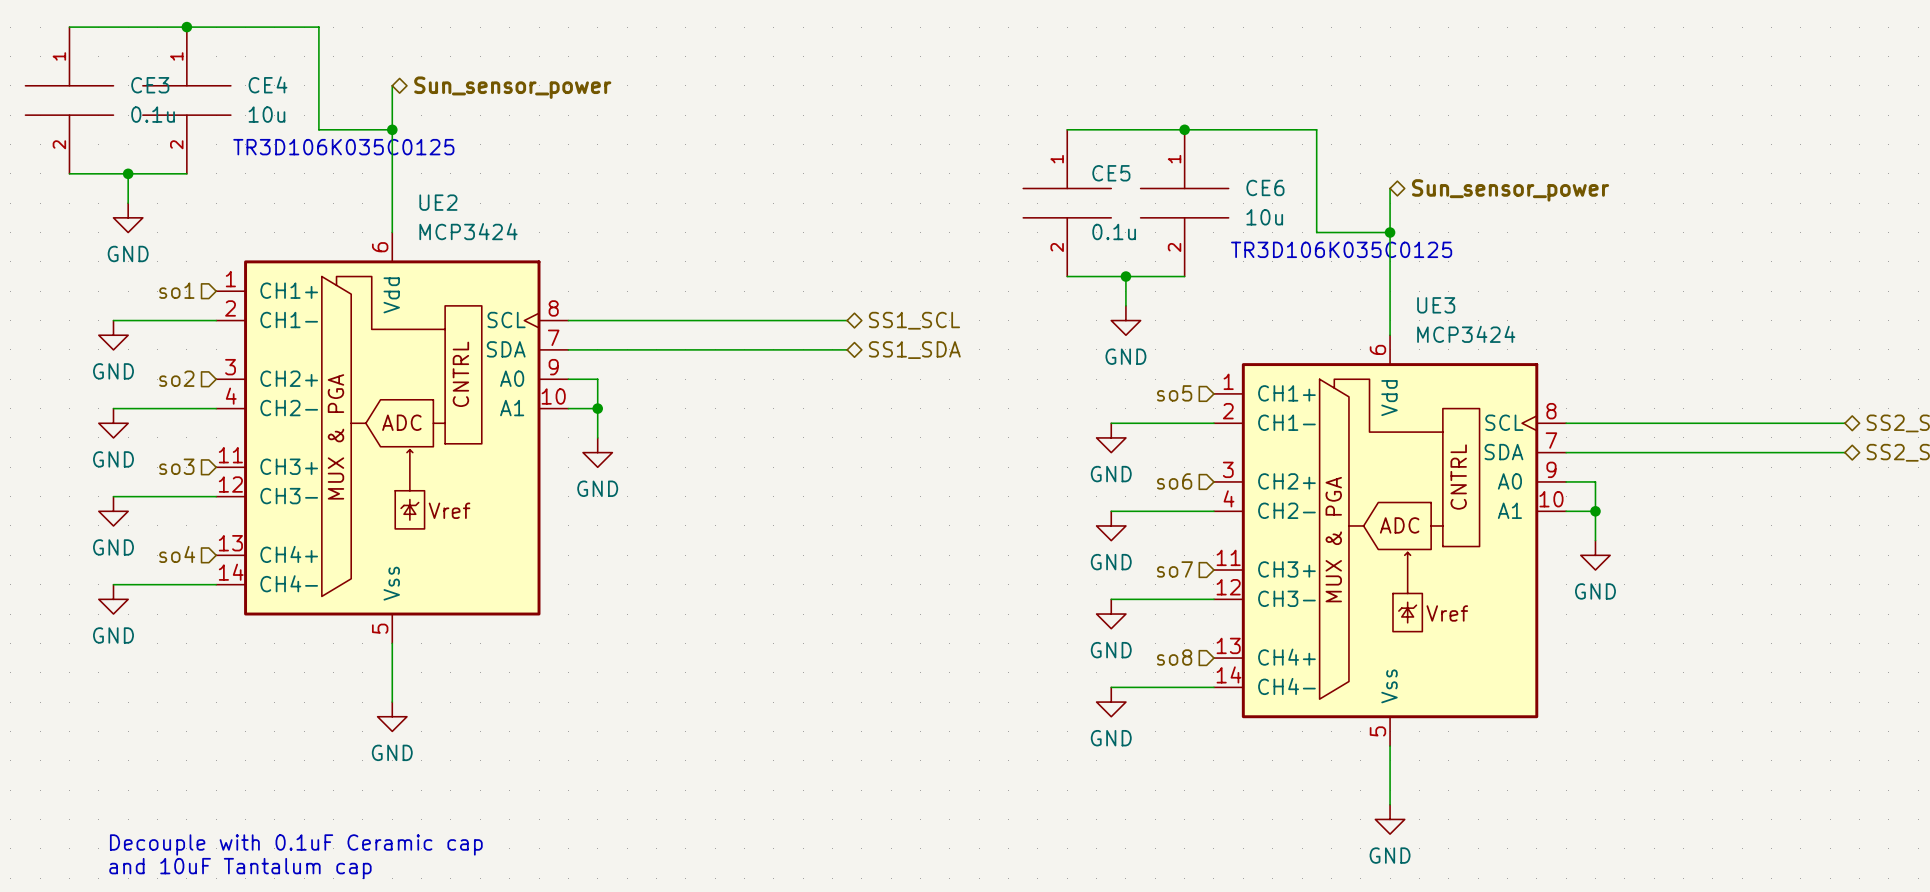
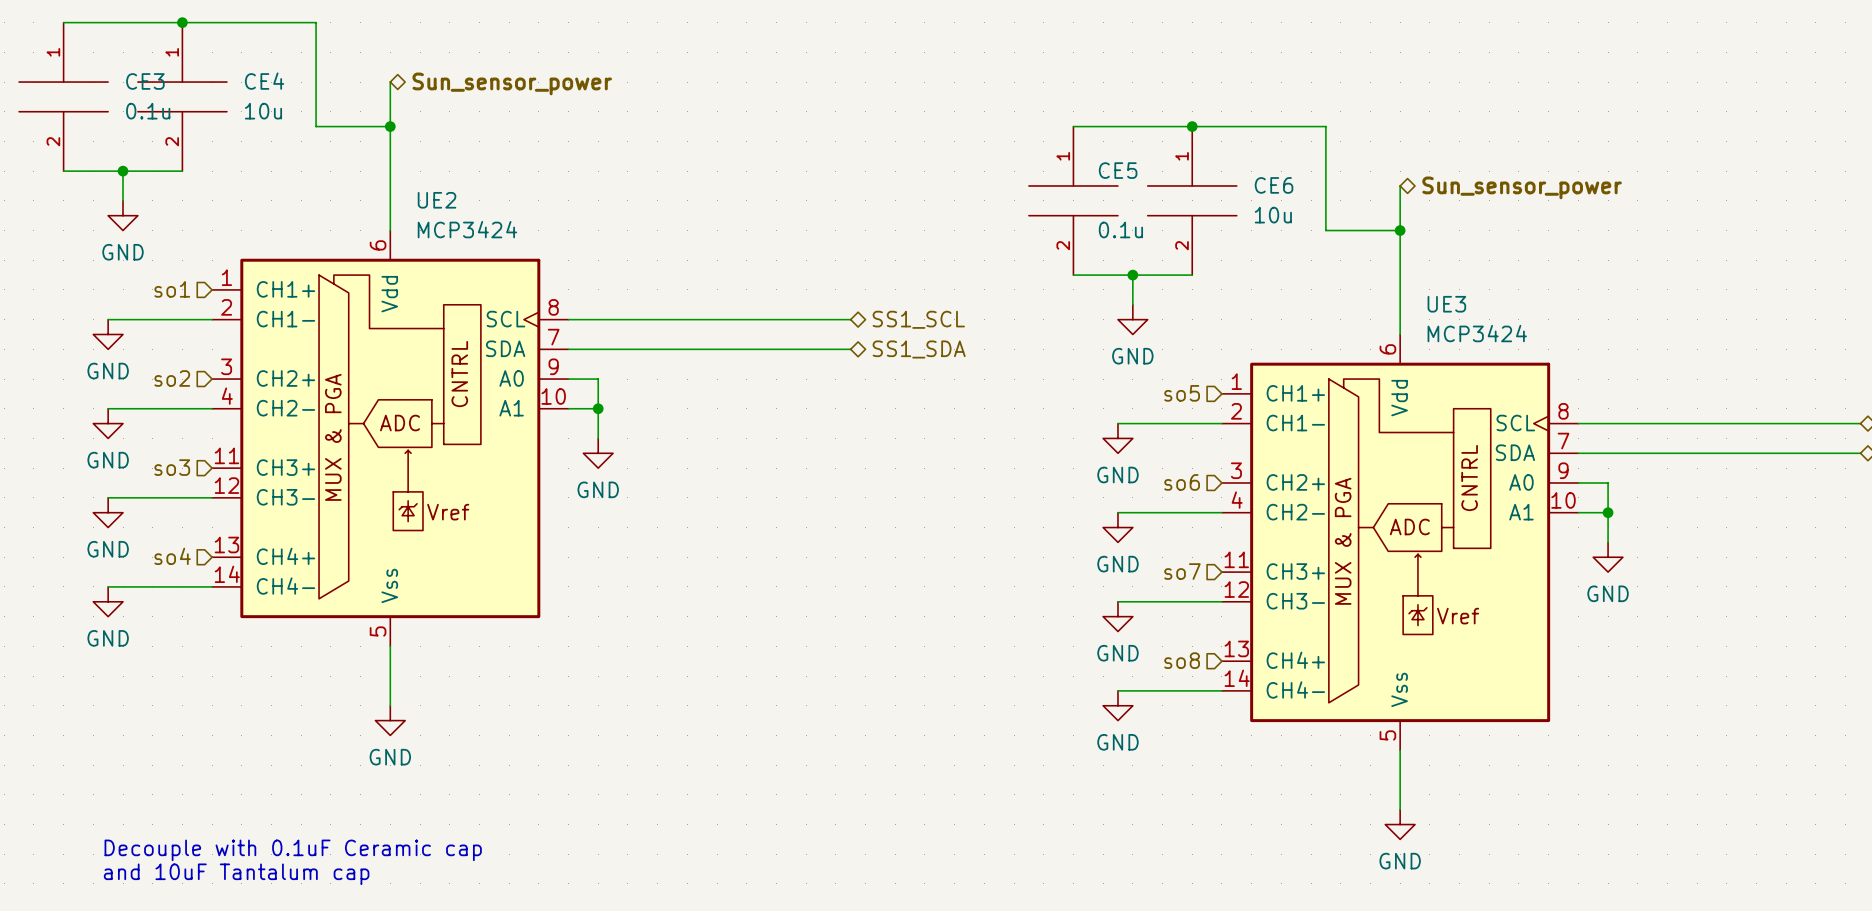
text: TR3D106K035C0125 (343, 147) -> none
text: TR3D106K035C0125 (1341, 249) -> none

